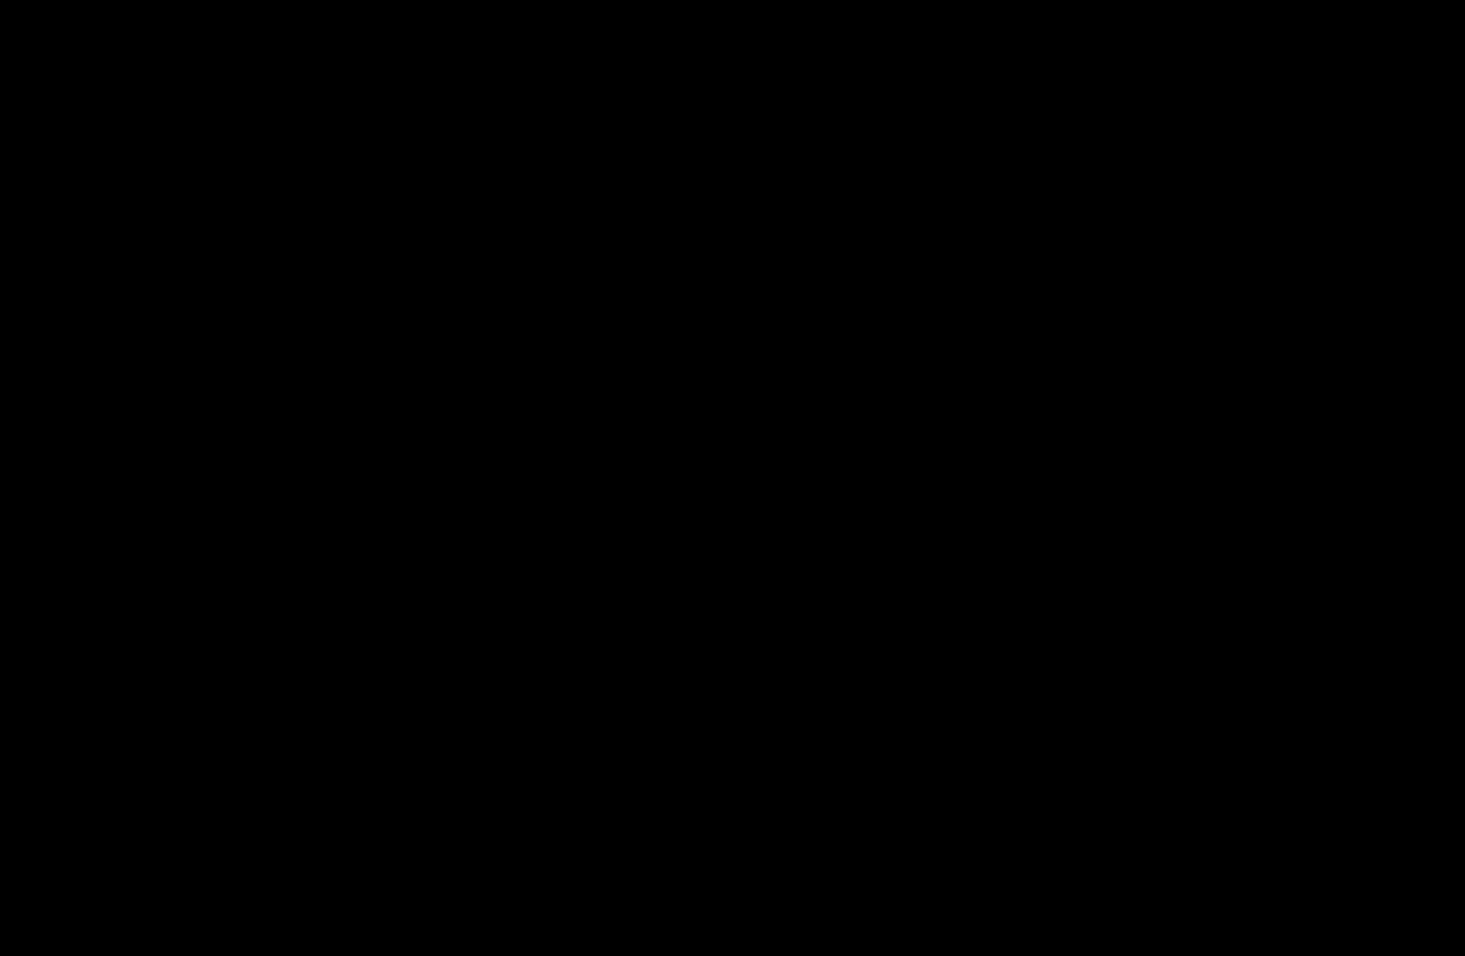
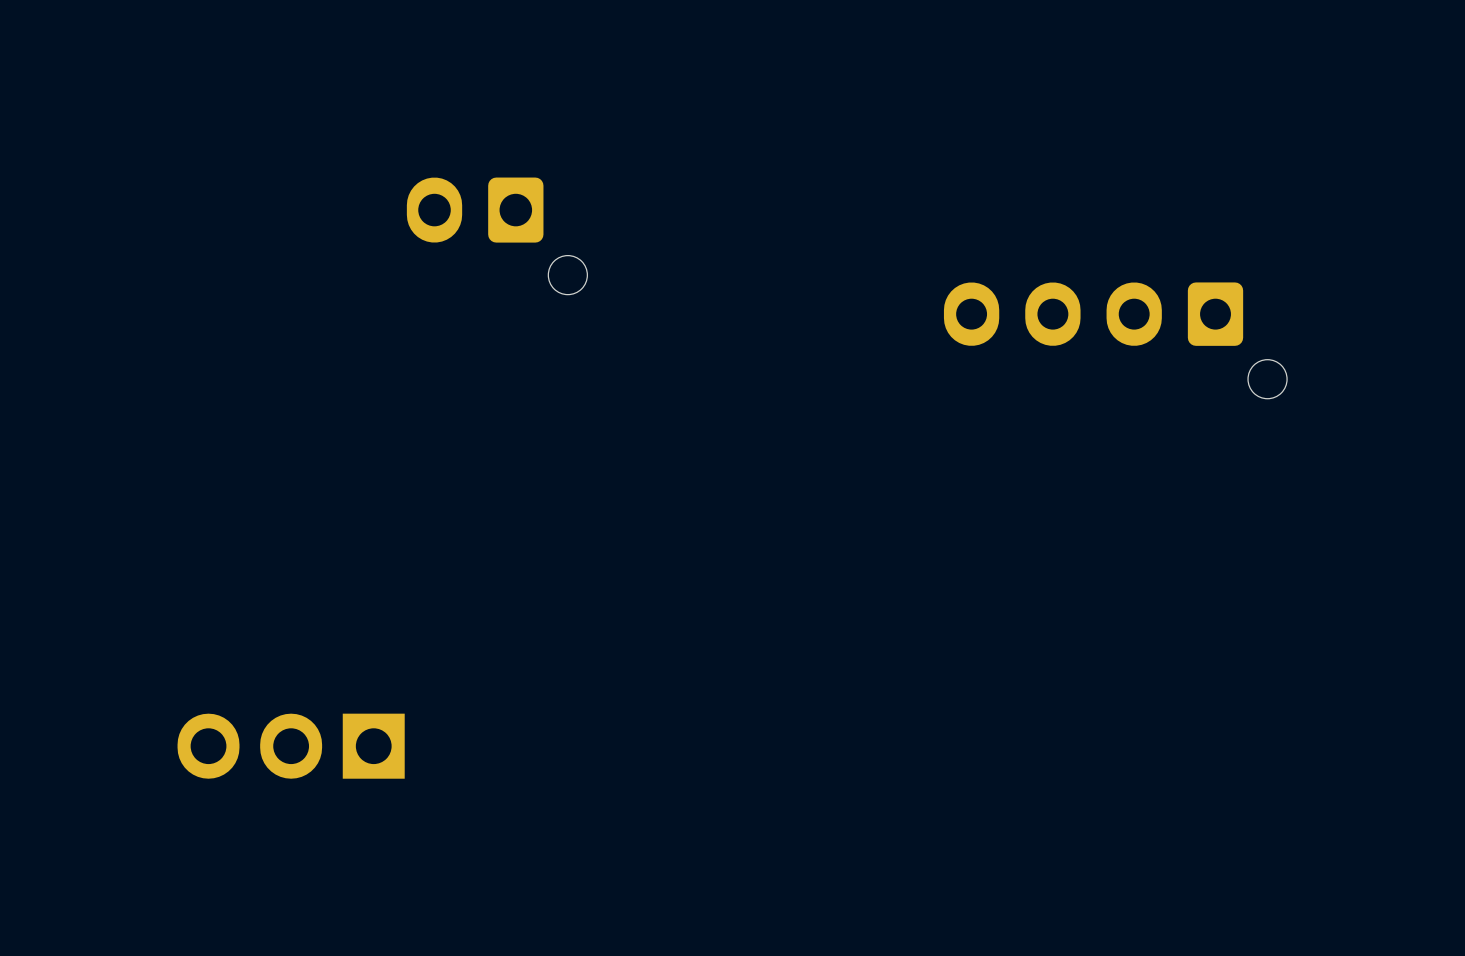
part: none -> (497, 236)
part: none -> (1115, 340)
part: none -> (291, 746)

